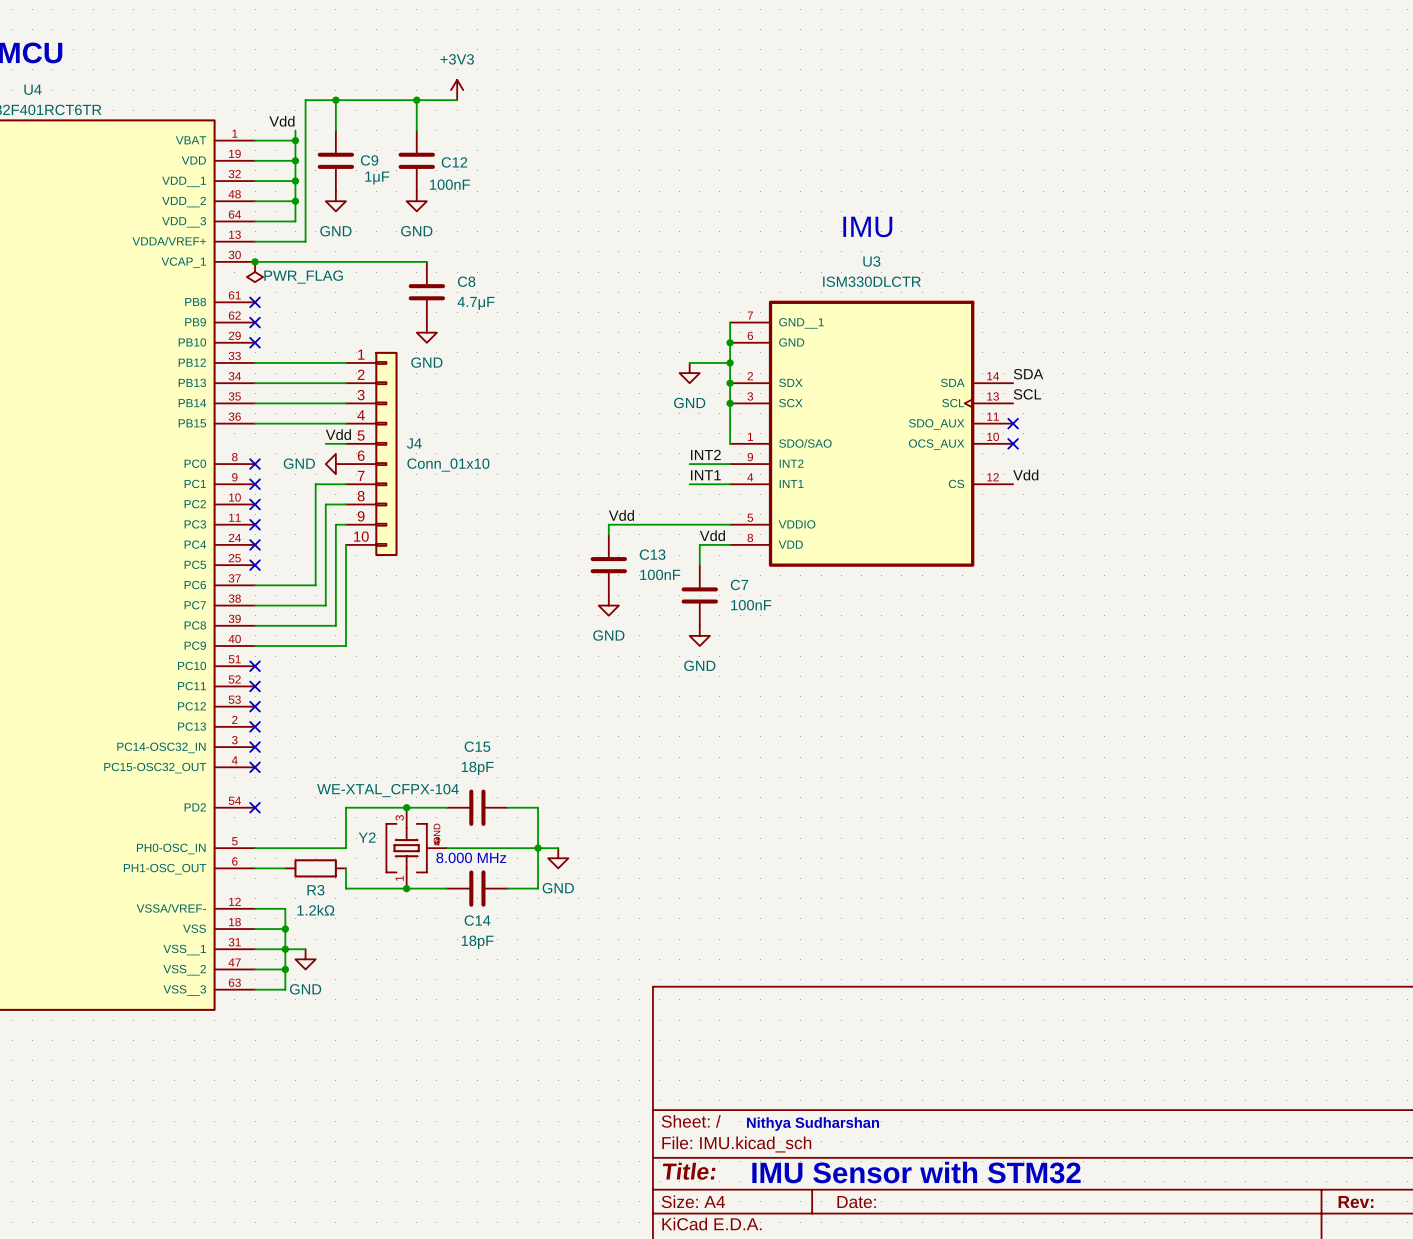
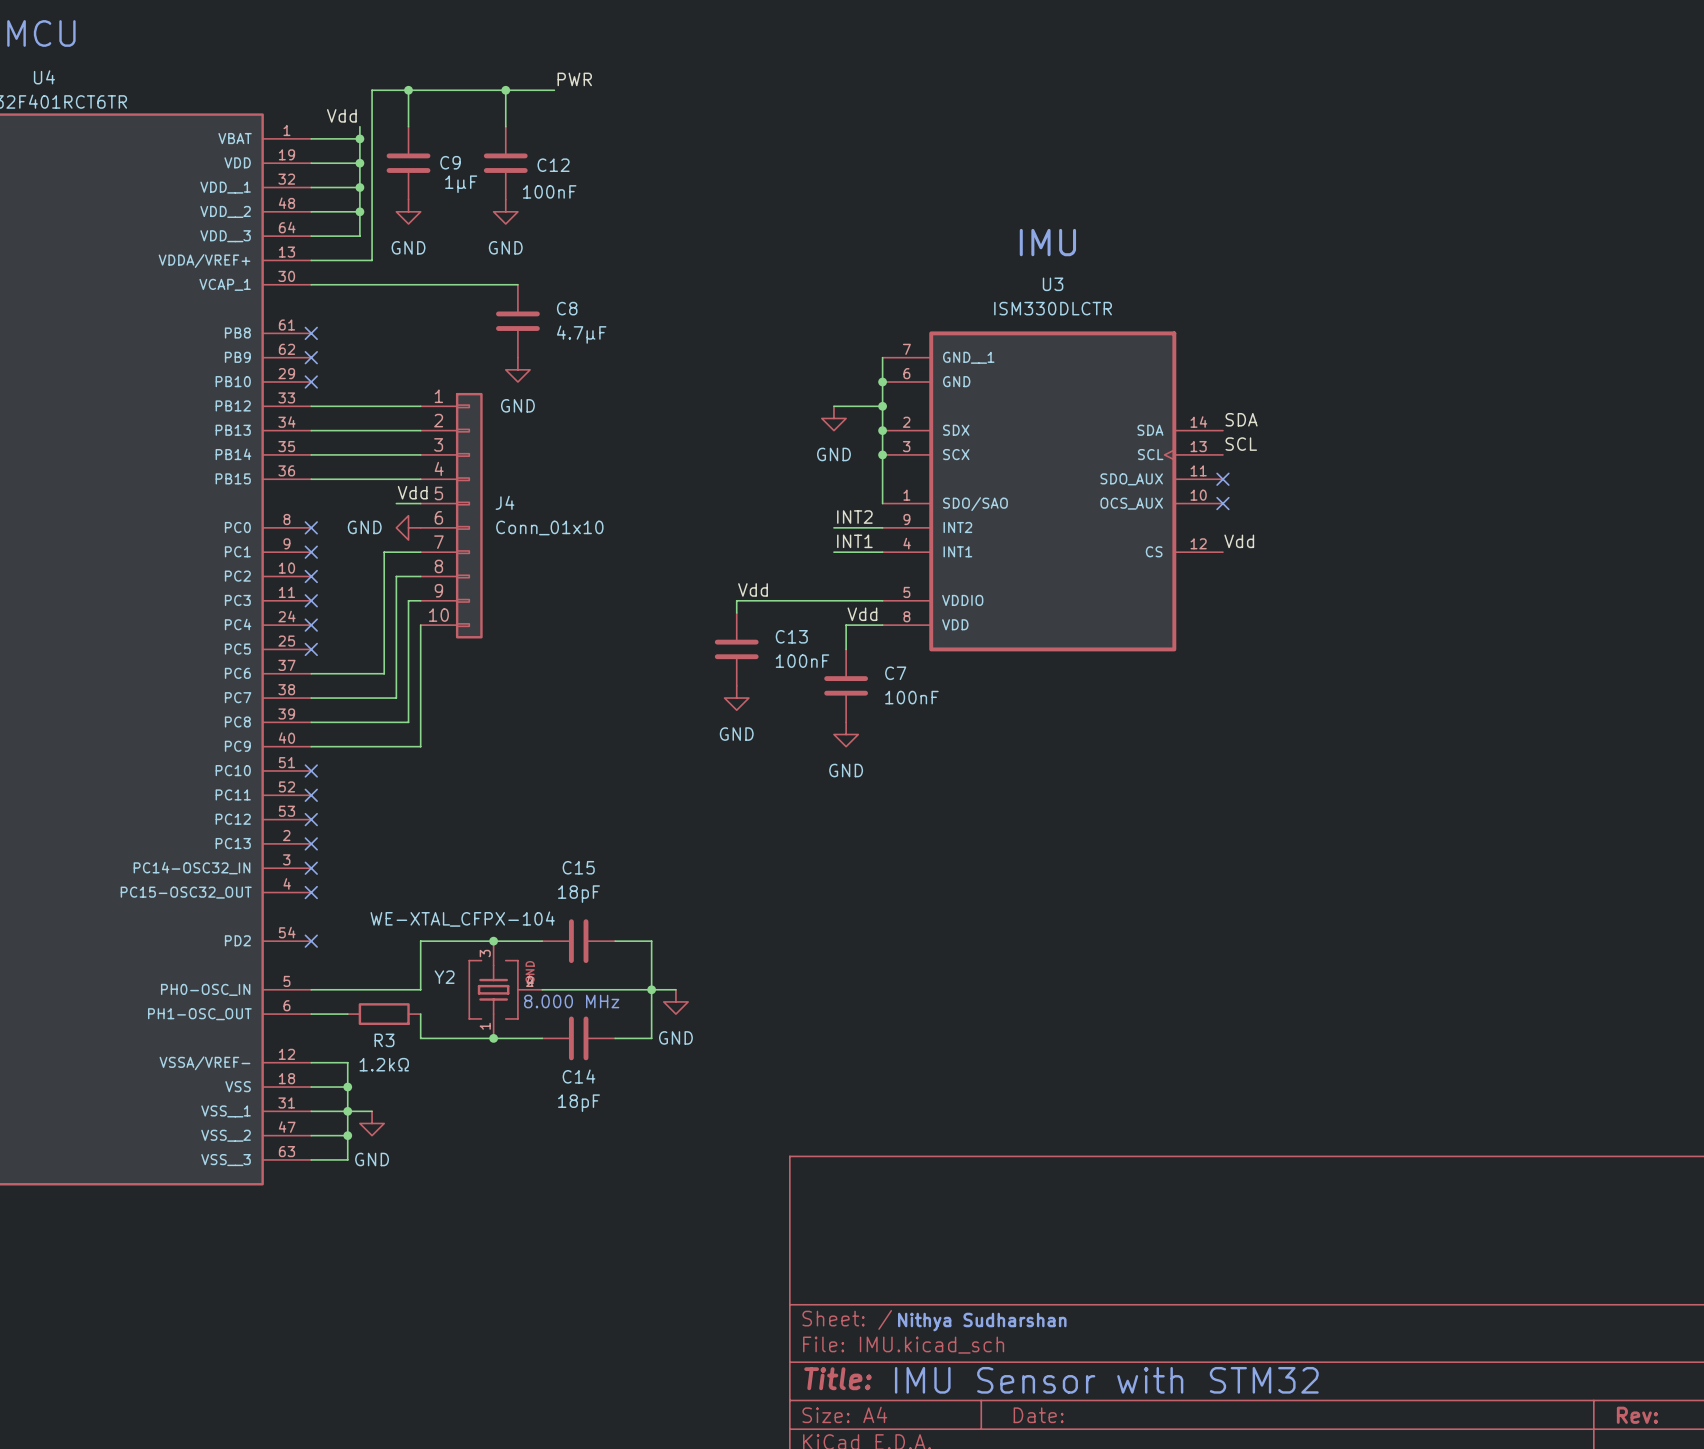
power symbol: +3V3 (457, 90) -> none
label: none -> PWR (574, 79)
junction: (255, 261) -> none
power symbol: PWR_FLAG (255, 272) -> none

